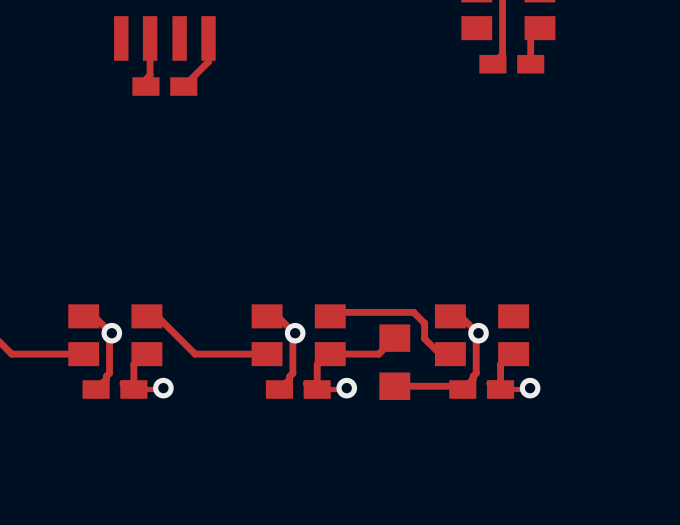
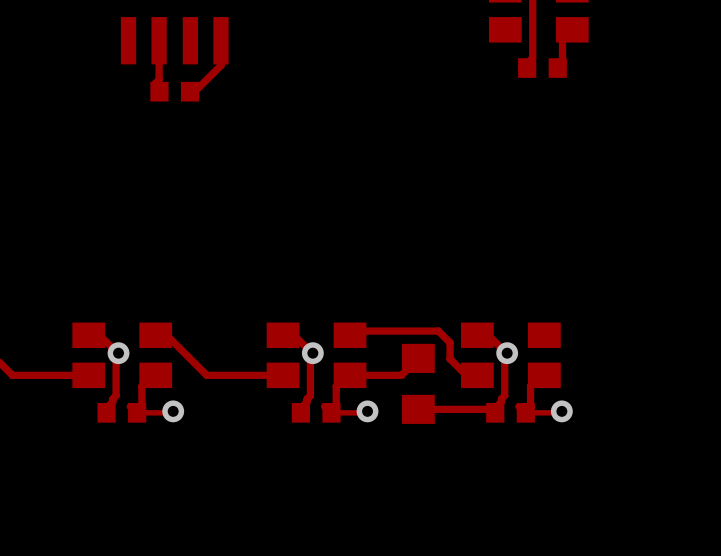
part footprint: [479, 54, 545, 74] -> [518, 58, 567, 78]
part footprint: [132, 77, 198, 96] -> [150, 81, 200, 102]
part footprint: [82, 380, 148, 399] -> [97, 403, 147, 423]
part footprint: [265, 380, 331, 399] -> [291, 403, 341, 423]
part footprint: [449, 380, 515, 399] -> [486, 403, 535, 423]

